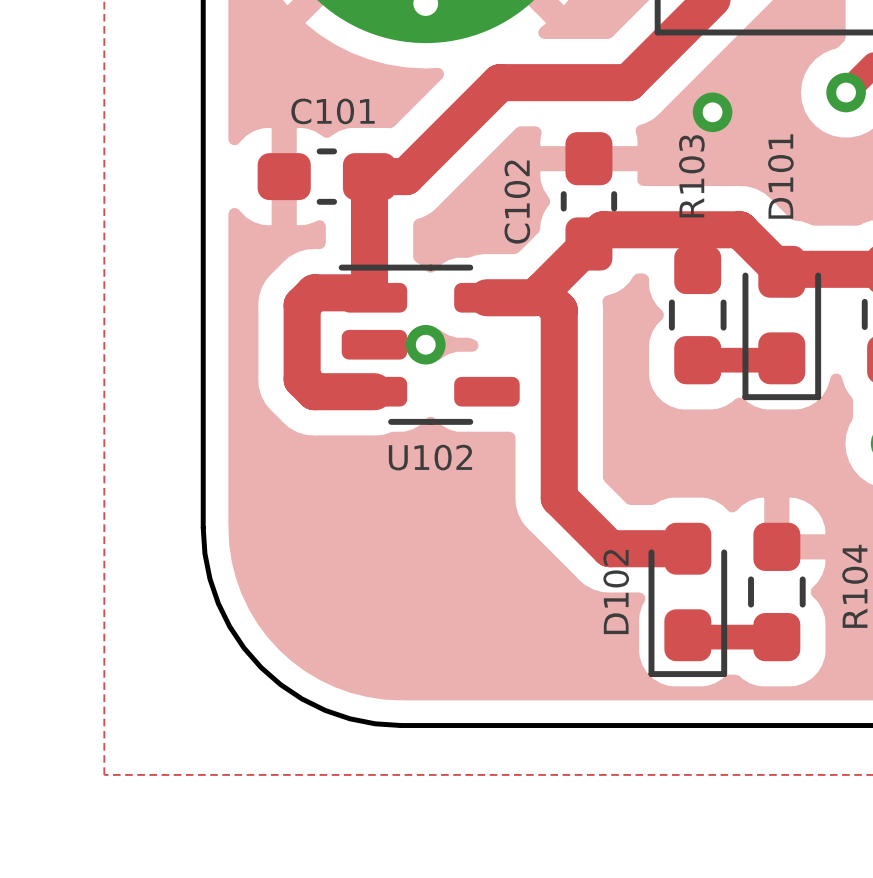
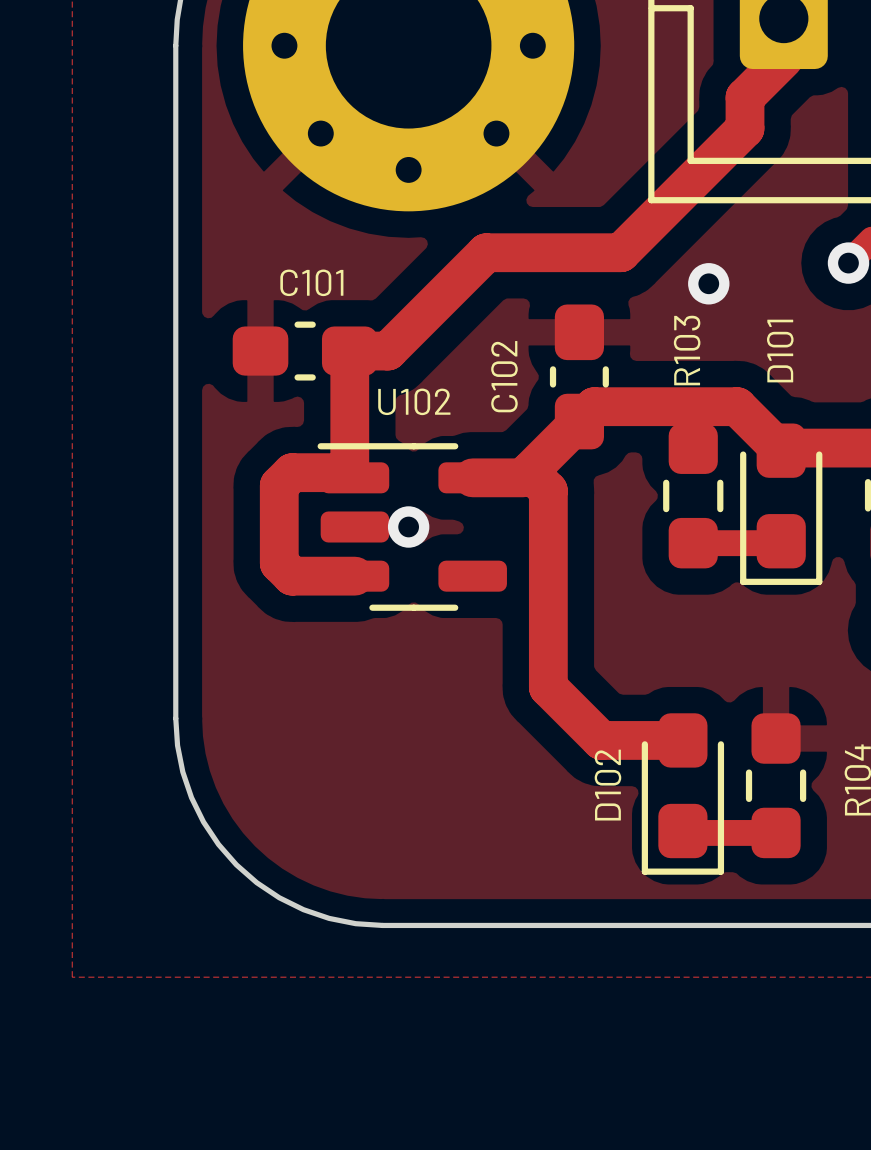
U102 name position: U102 (430, 457) -> U102 (414, 401)

